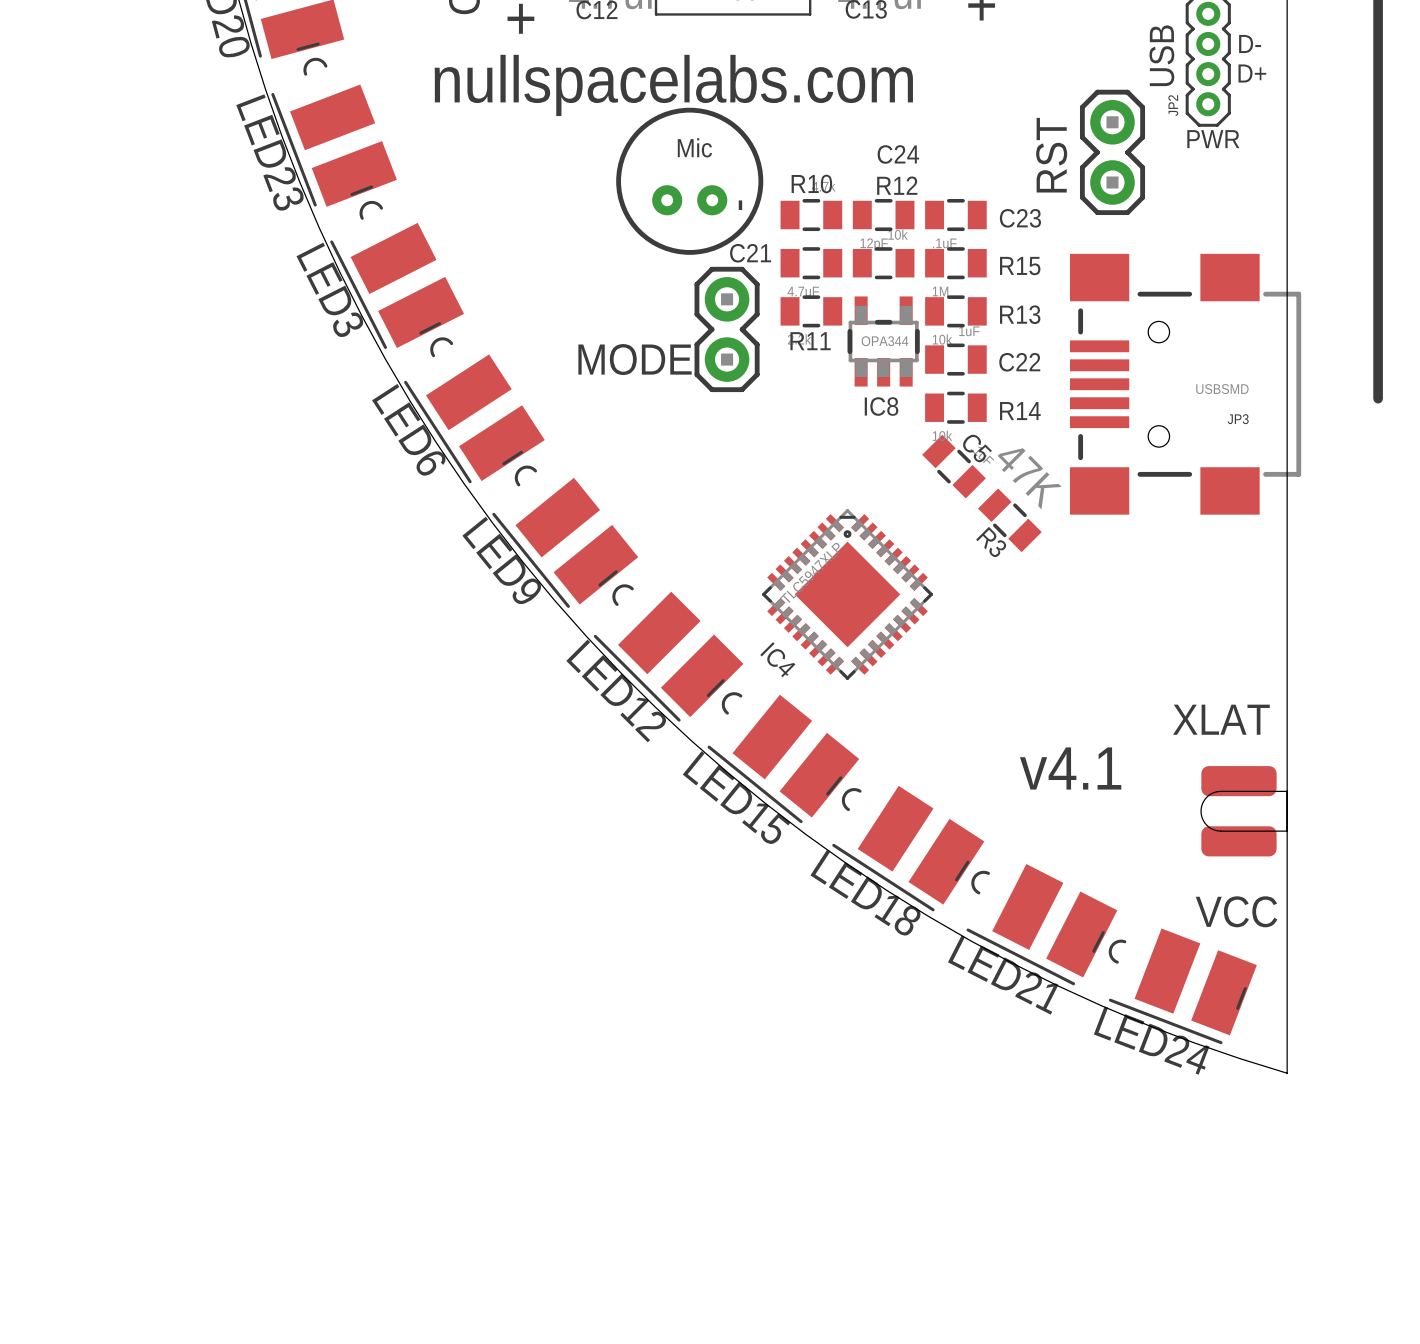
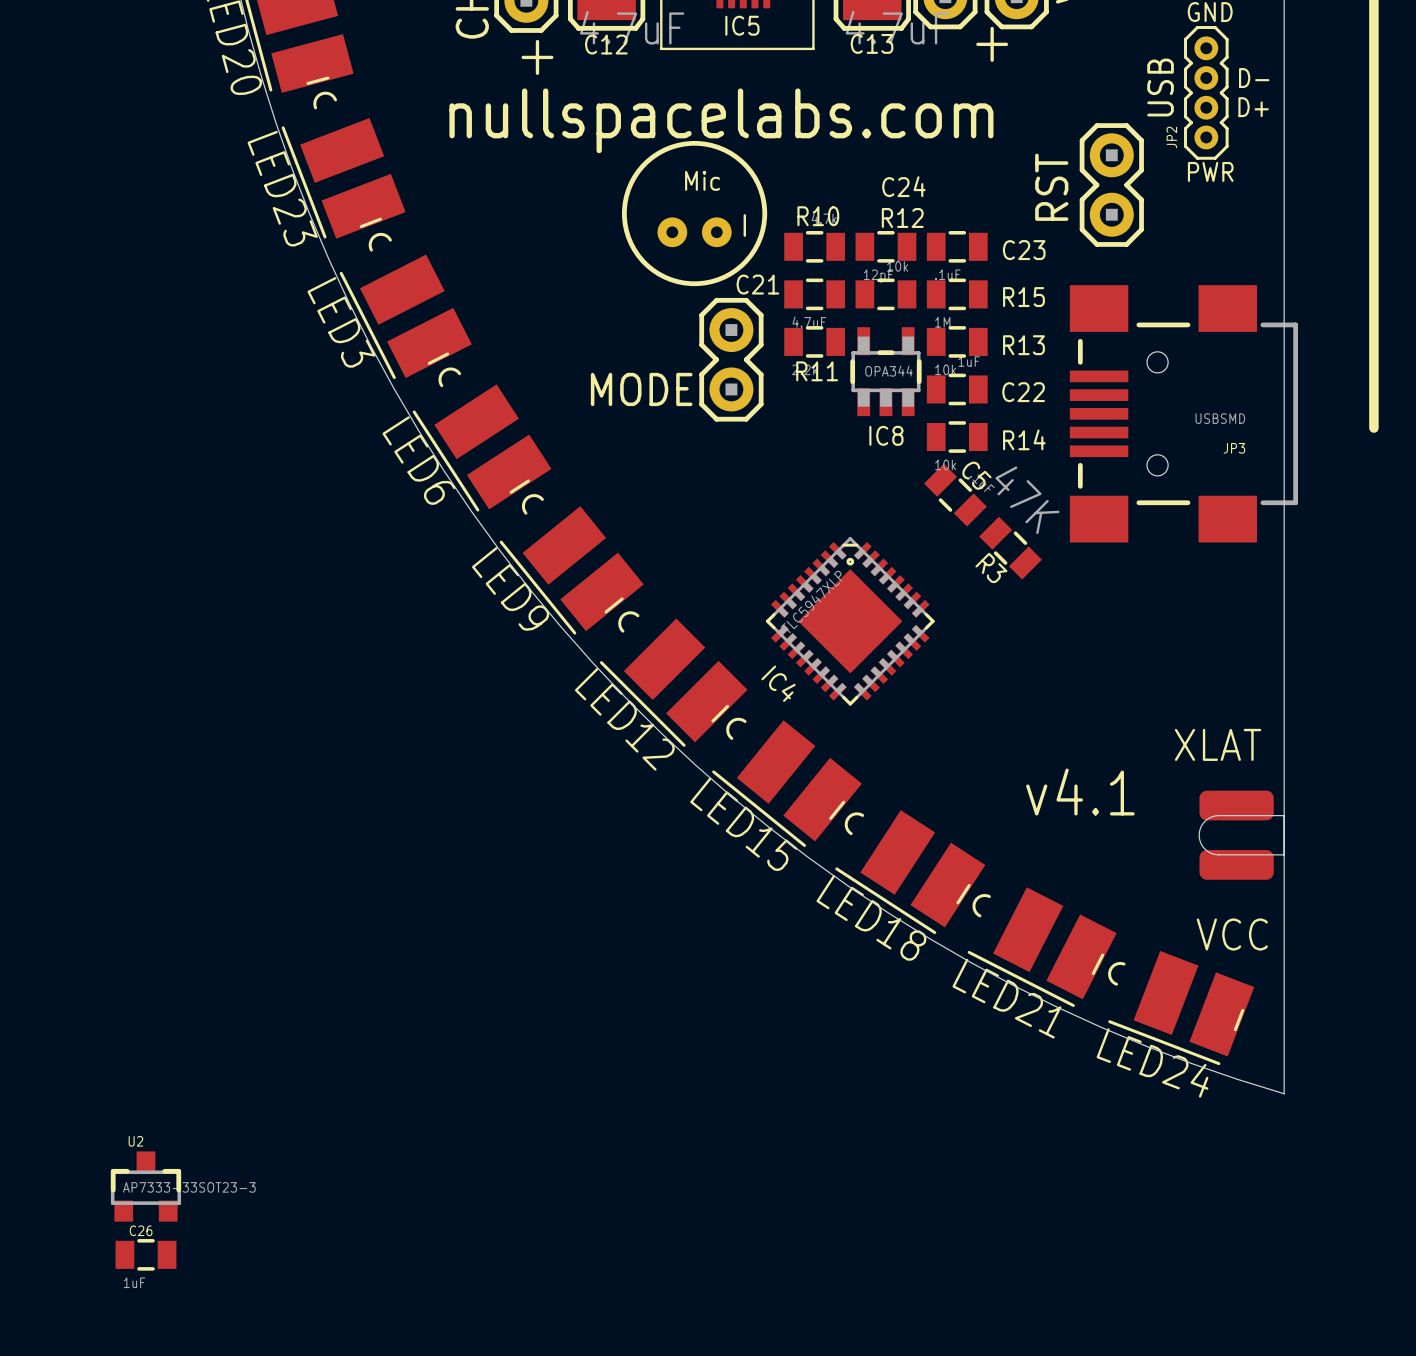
U2: none -> AP7333-33SOT23-3 (145, 1186)
C26: none -> 1uF (145, 1254)

